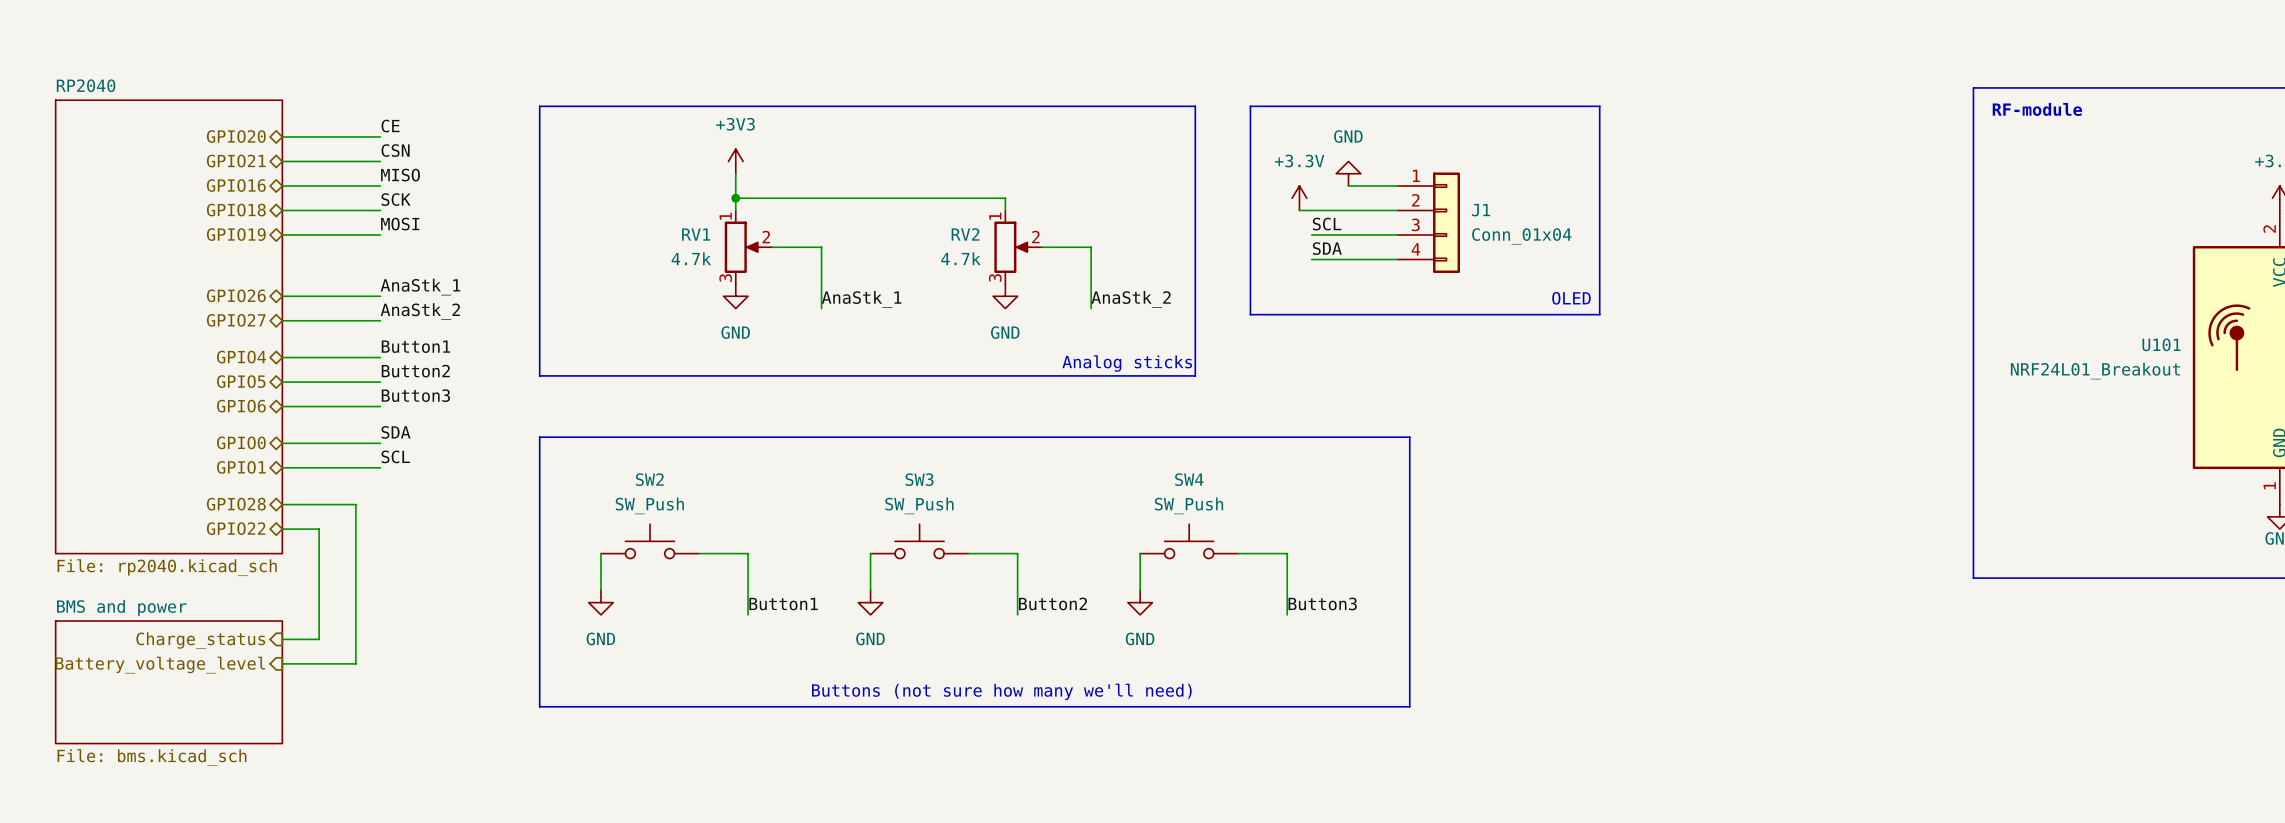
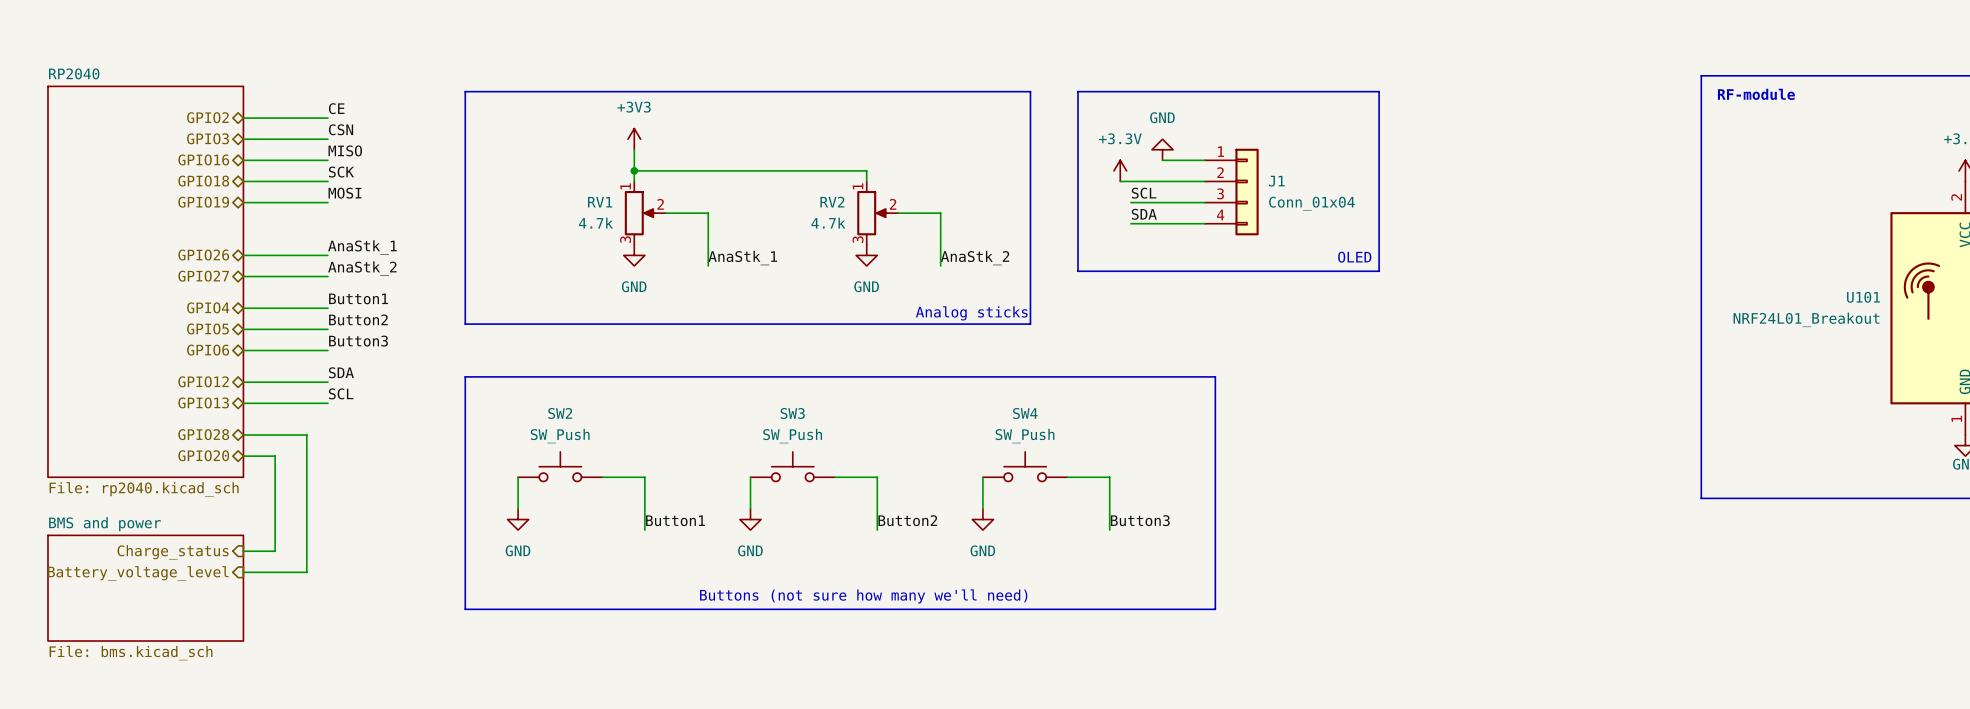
hierarchical label: GPIO20 (236, 136) -> GPIO2 (207, 117)
hierarchical label: GPIO21 (236, 161) -> GPIO3 (208, 138)
hierarchical label: GPIO0 (241, 442) -> GPIO12 (203, 381)
hierarchical label: GPIO1 (241, 467) -> GPIO13 (203, 402)
hierarchical label: GPIO22 (236, 528) -> GPIO20 (203, 455)

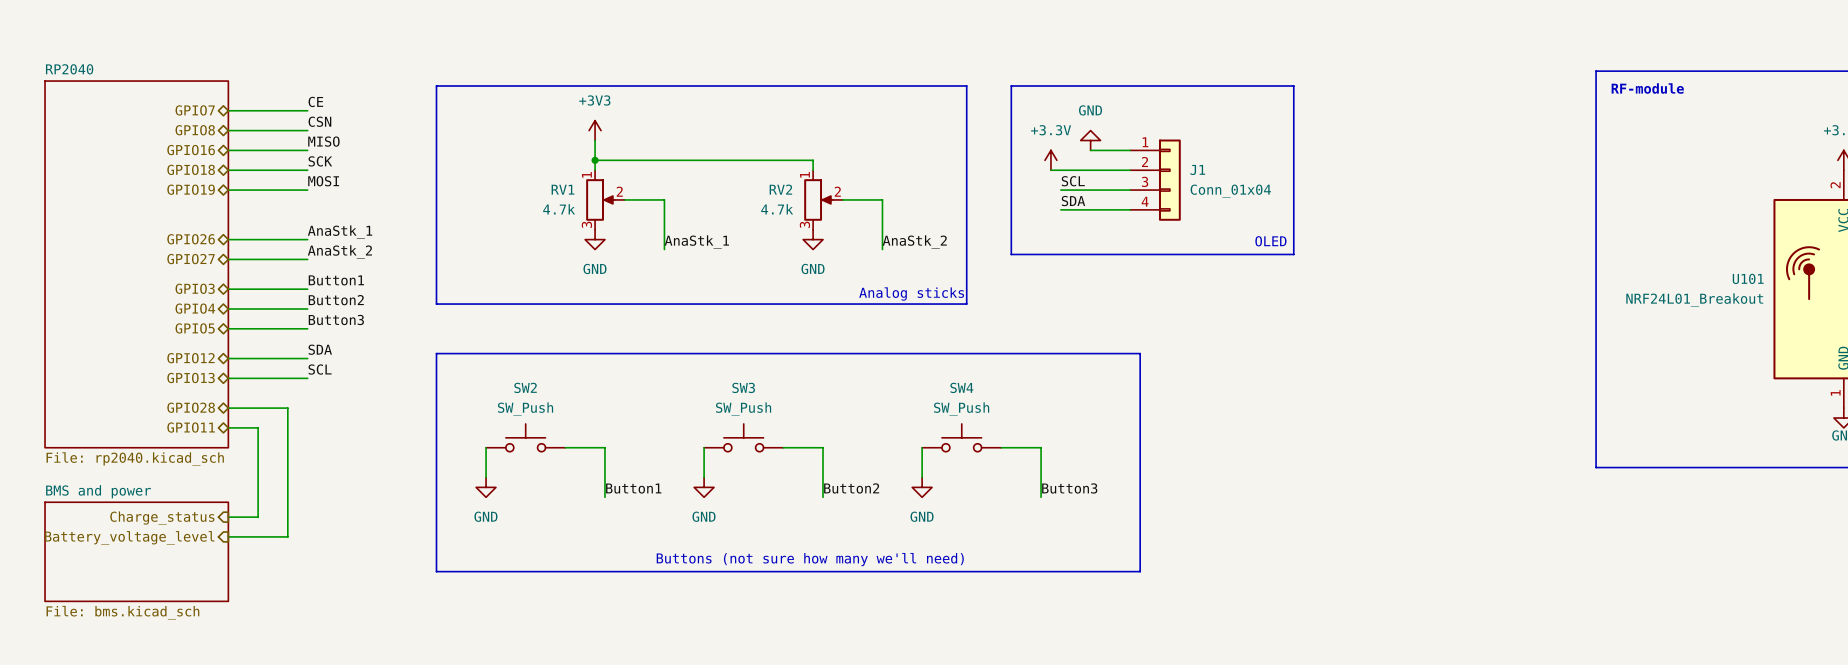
hierarchical label: GPIO2 (207, 117) -> GPIO7 (195, 110)
hierarchical label: GPIO3 (208, 138) -> GPIO8 (195, 130)
hierarchical label: GPIO4 (208, 307) -> GPIO3 (195, 288)
hierarchical label: GPIO5 (207, 328) -> GPIO4 (195, 308)
hierarchical label: GPIO6 (208, 350) -> GPIO5 (195, 328)
hierarchical label: GPIO20 (203, 455) -> GPIO11 (191, 427)

